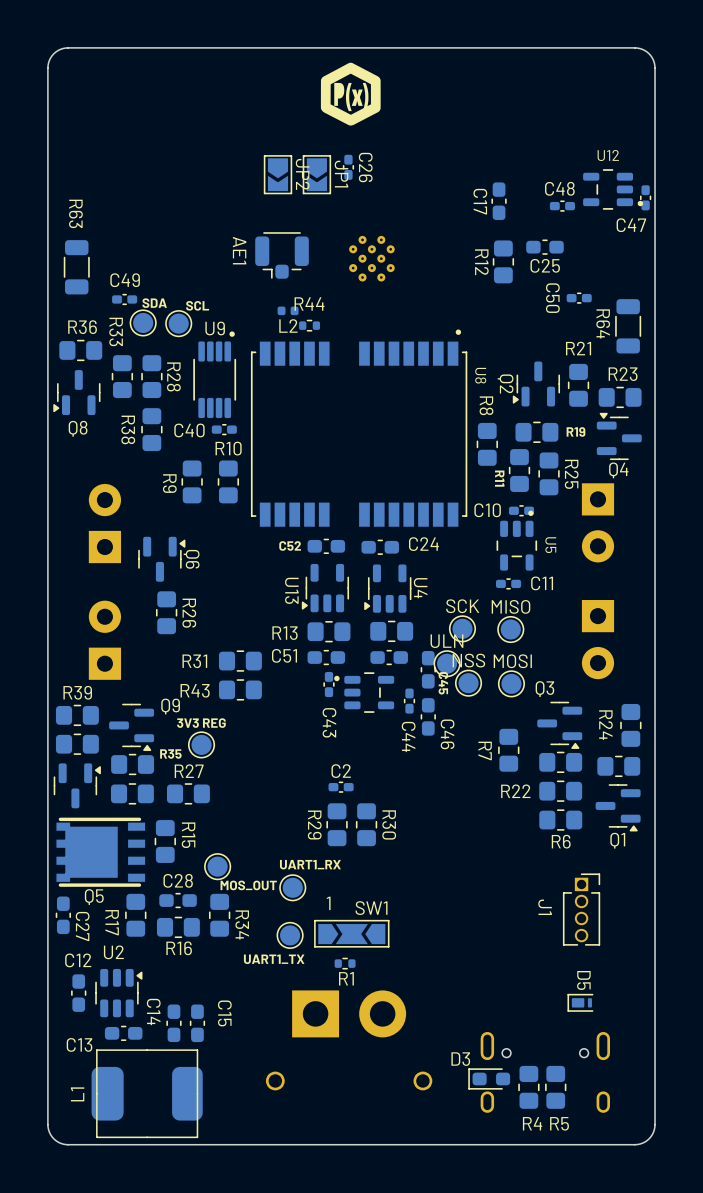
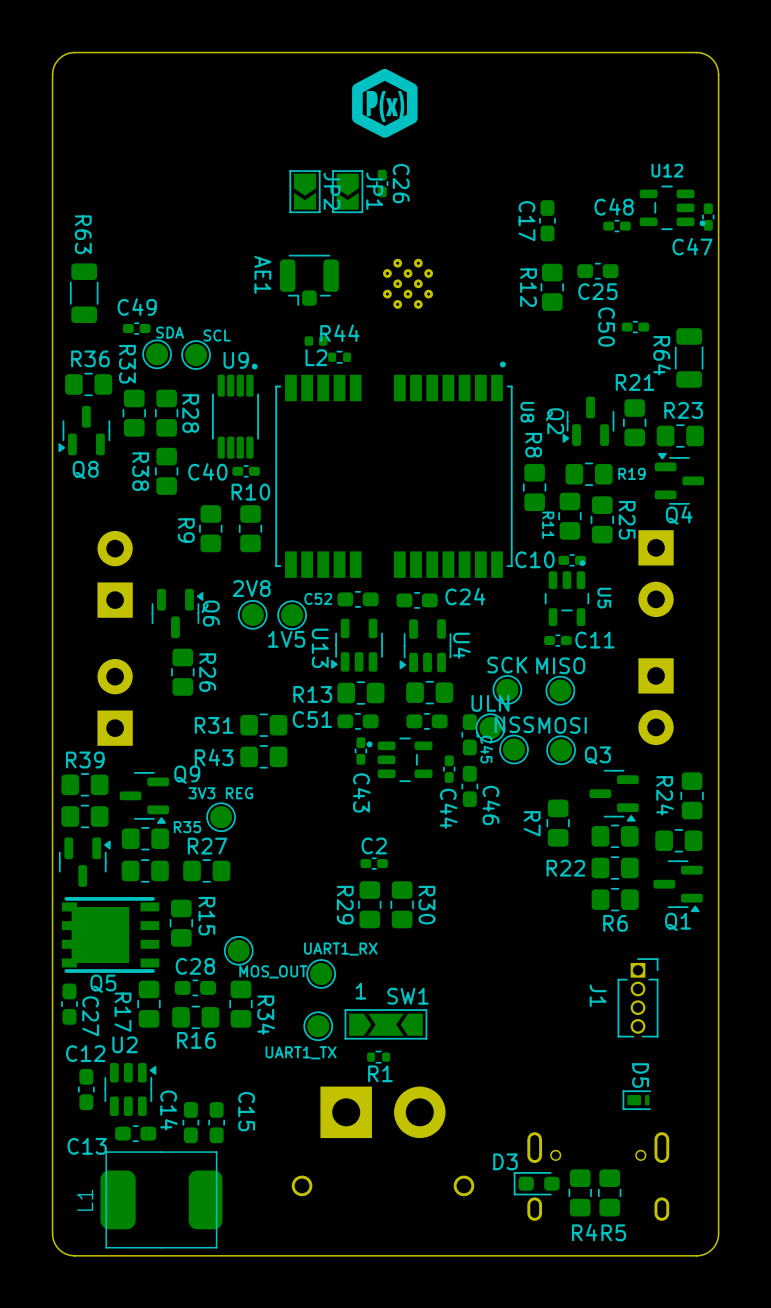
2V8: none -> (252, 614)
1V5: none -> (292, 615)

